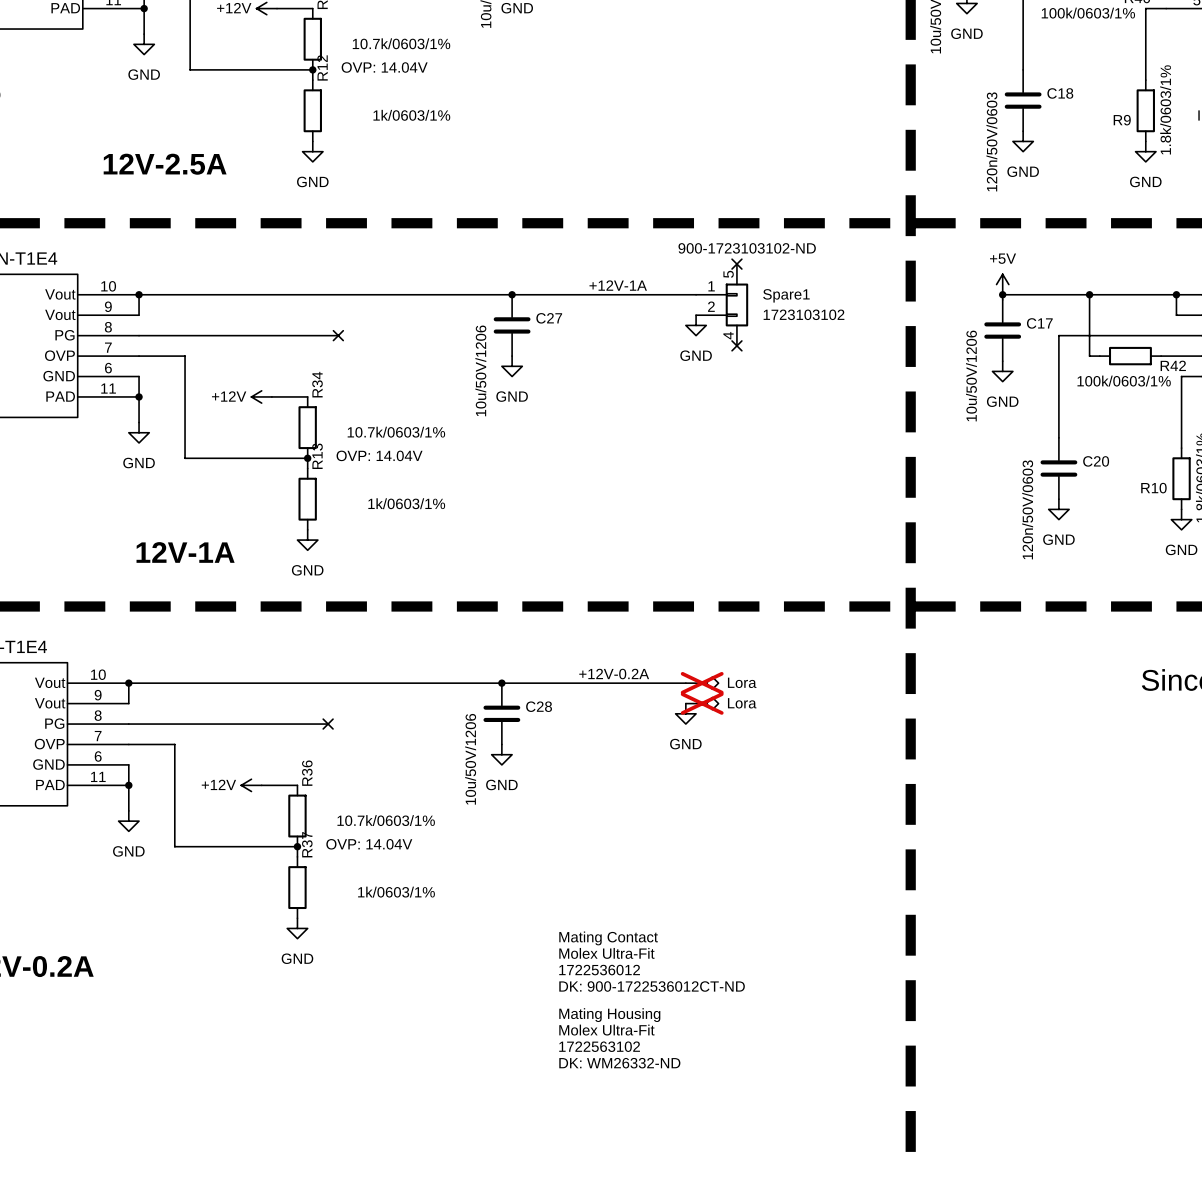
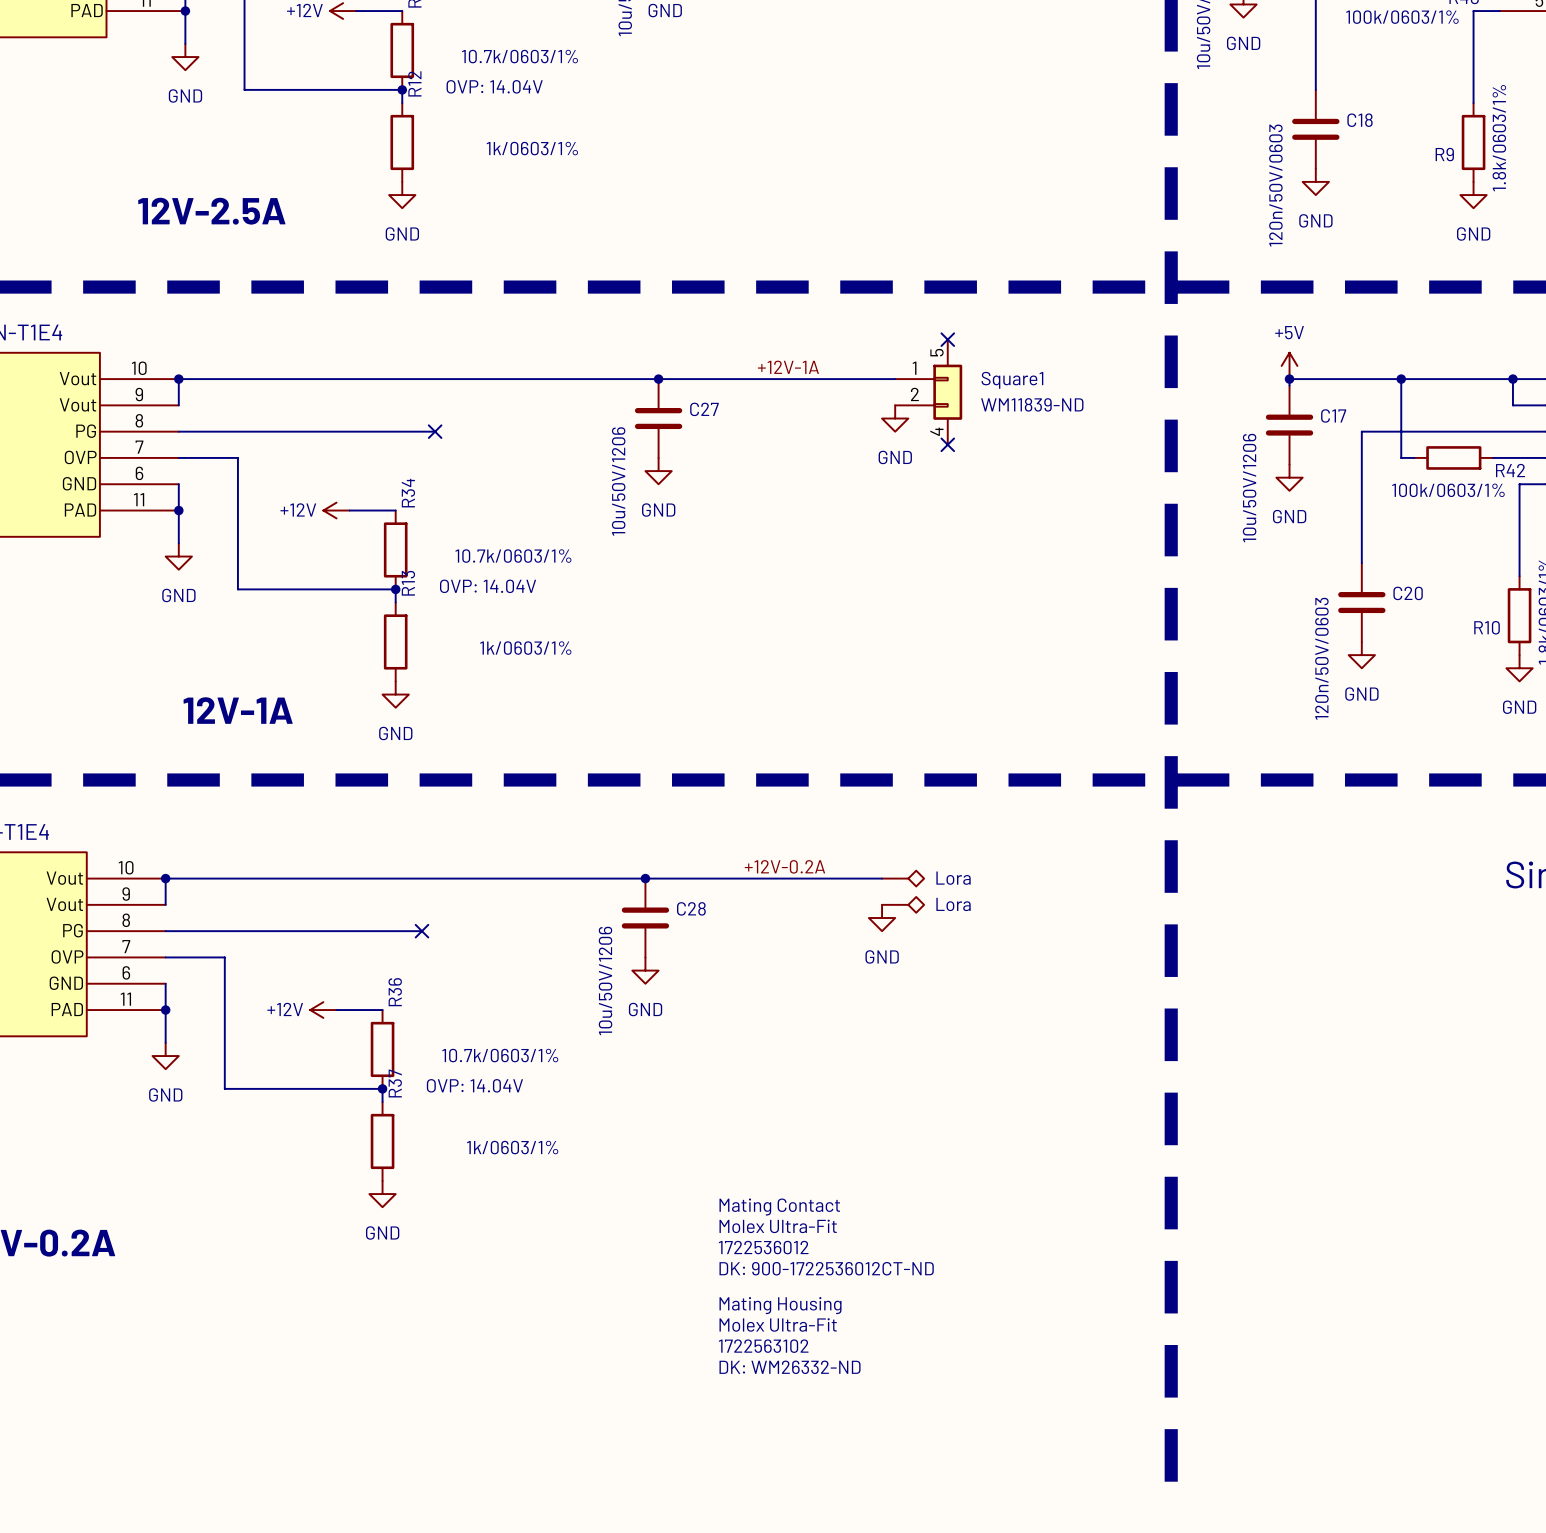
Spare1 text: 900-1723103102-ND (747, 248) -> none
Spare1 name: Spare1 (786, 295) -> Square1 (1012, 380)
Spare1 value: 1723103102 (804, 314) -> WM11839-ND (1032, 404)
part do-not-place cross: (702, 683) -> none
part do-not-place cross: (702, 703) -> none

